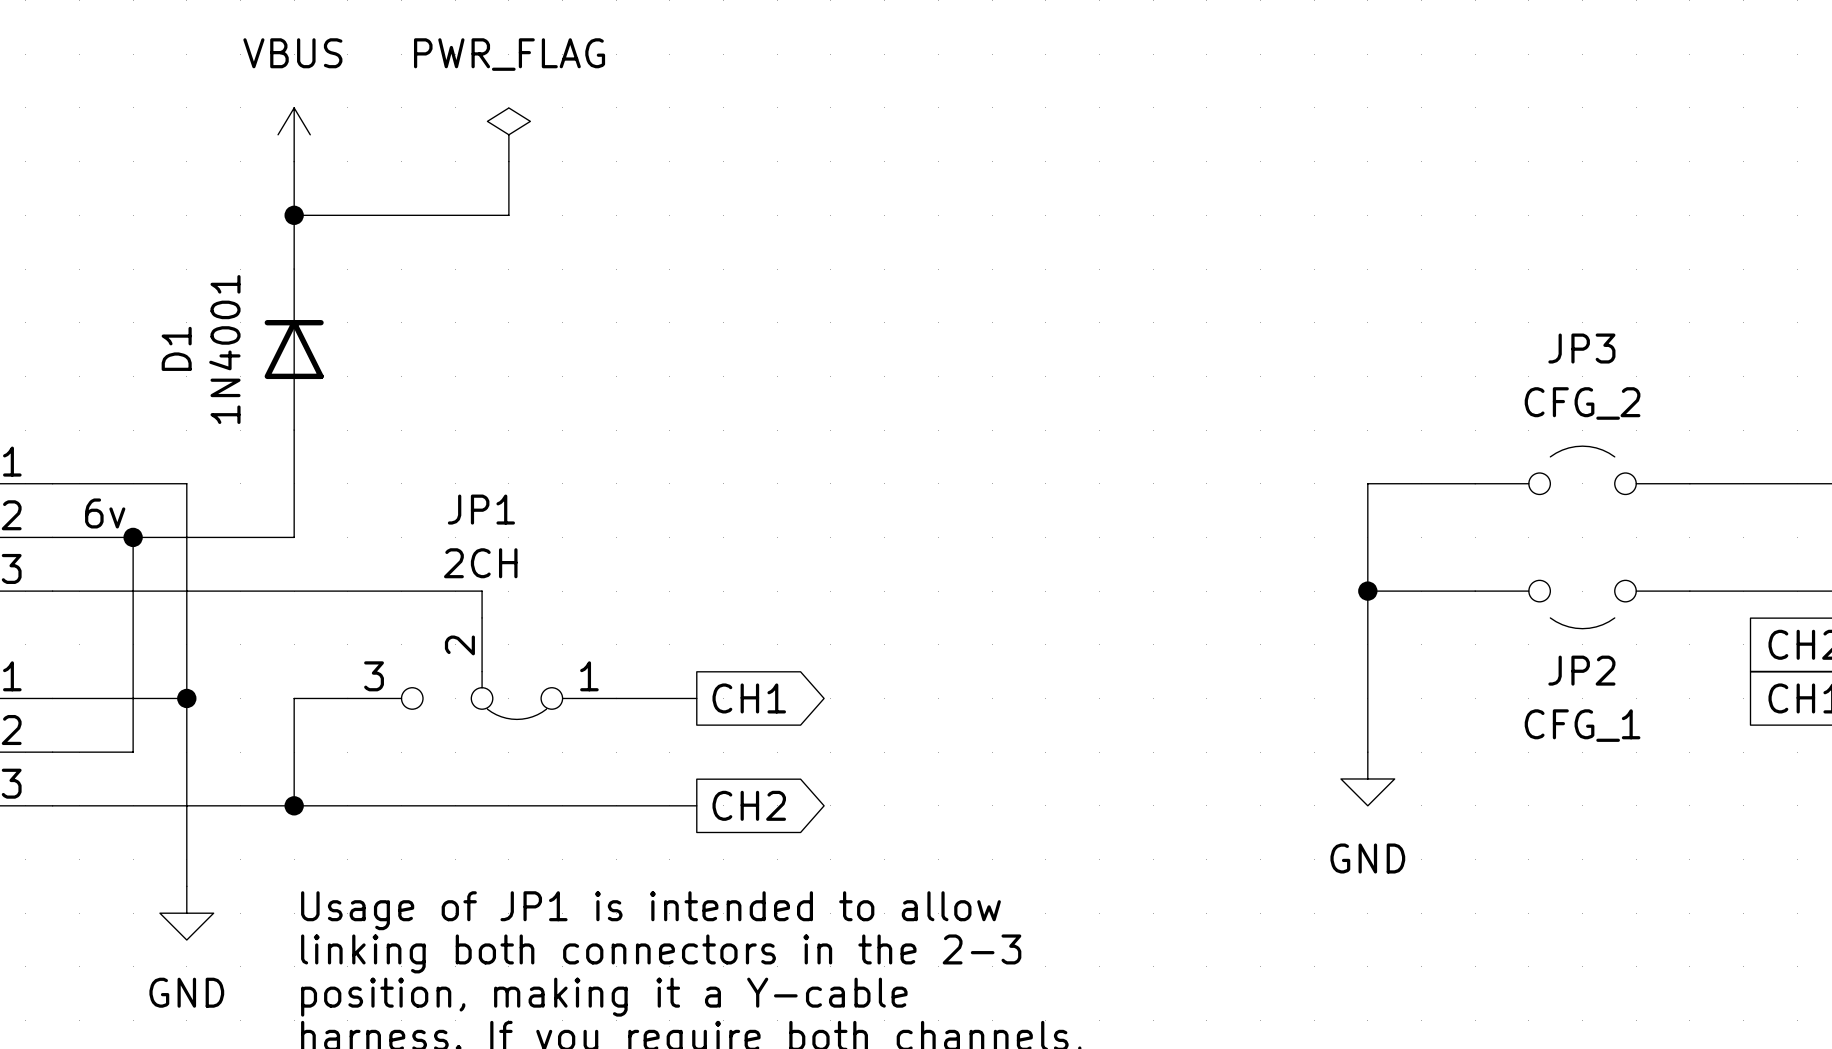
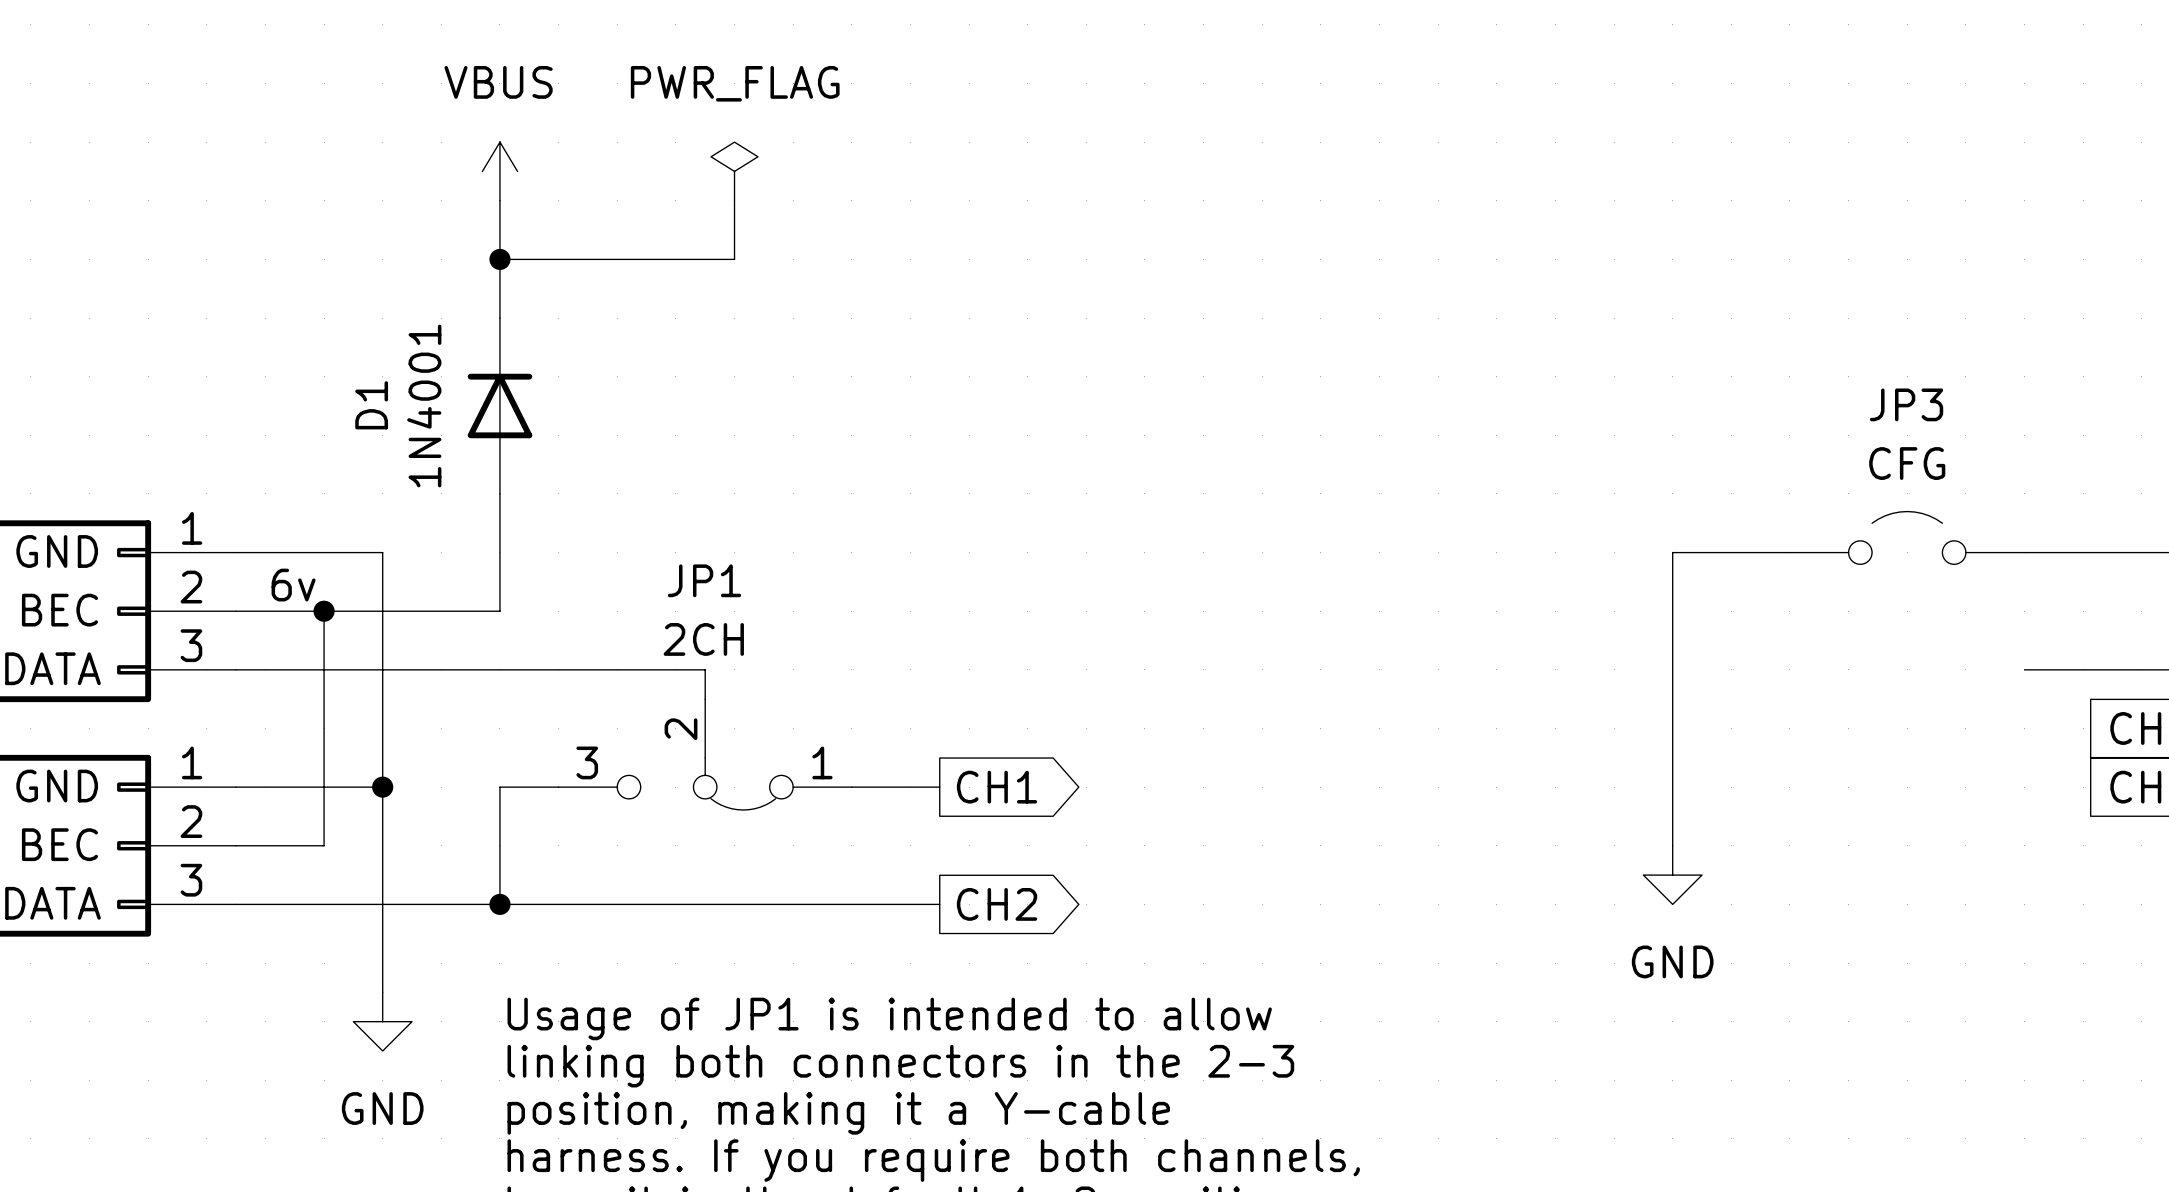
JP3 value: CFG_2 (1582, 403) -> CFG (1907, 463)
wire: (1367, 591) (1475, 591) -> none
junction: (1367, 591) -> none
JP2: CFG_1 (1582, 604) -> none

